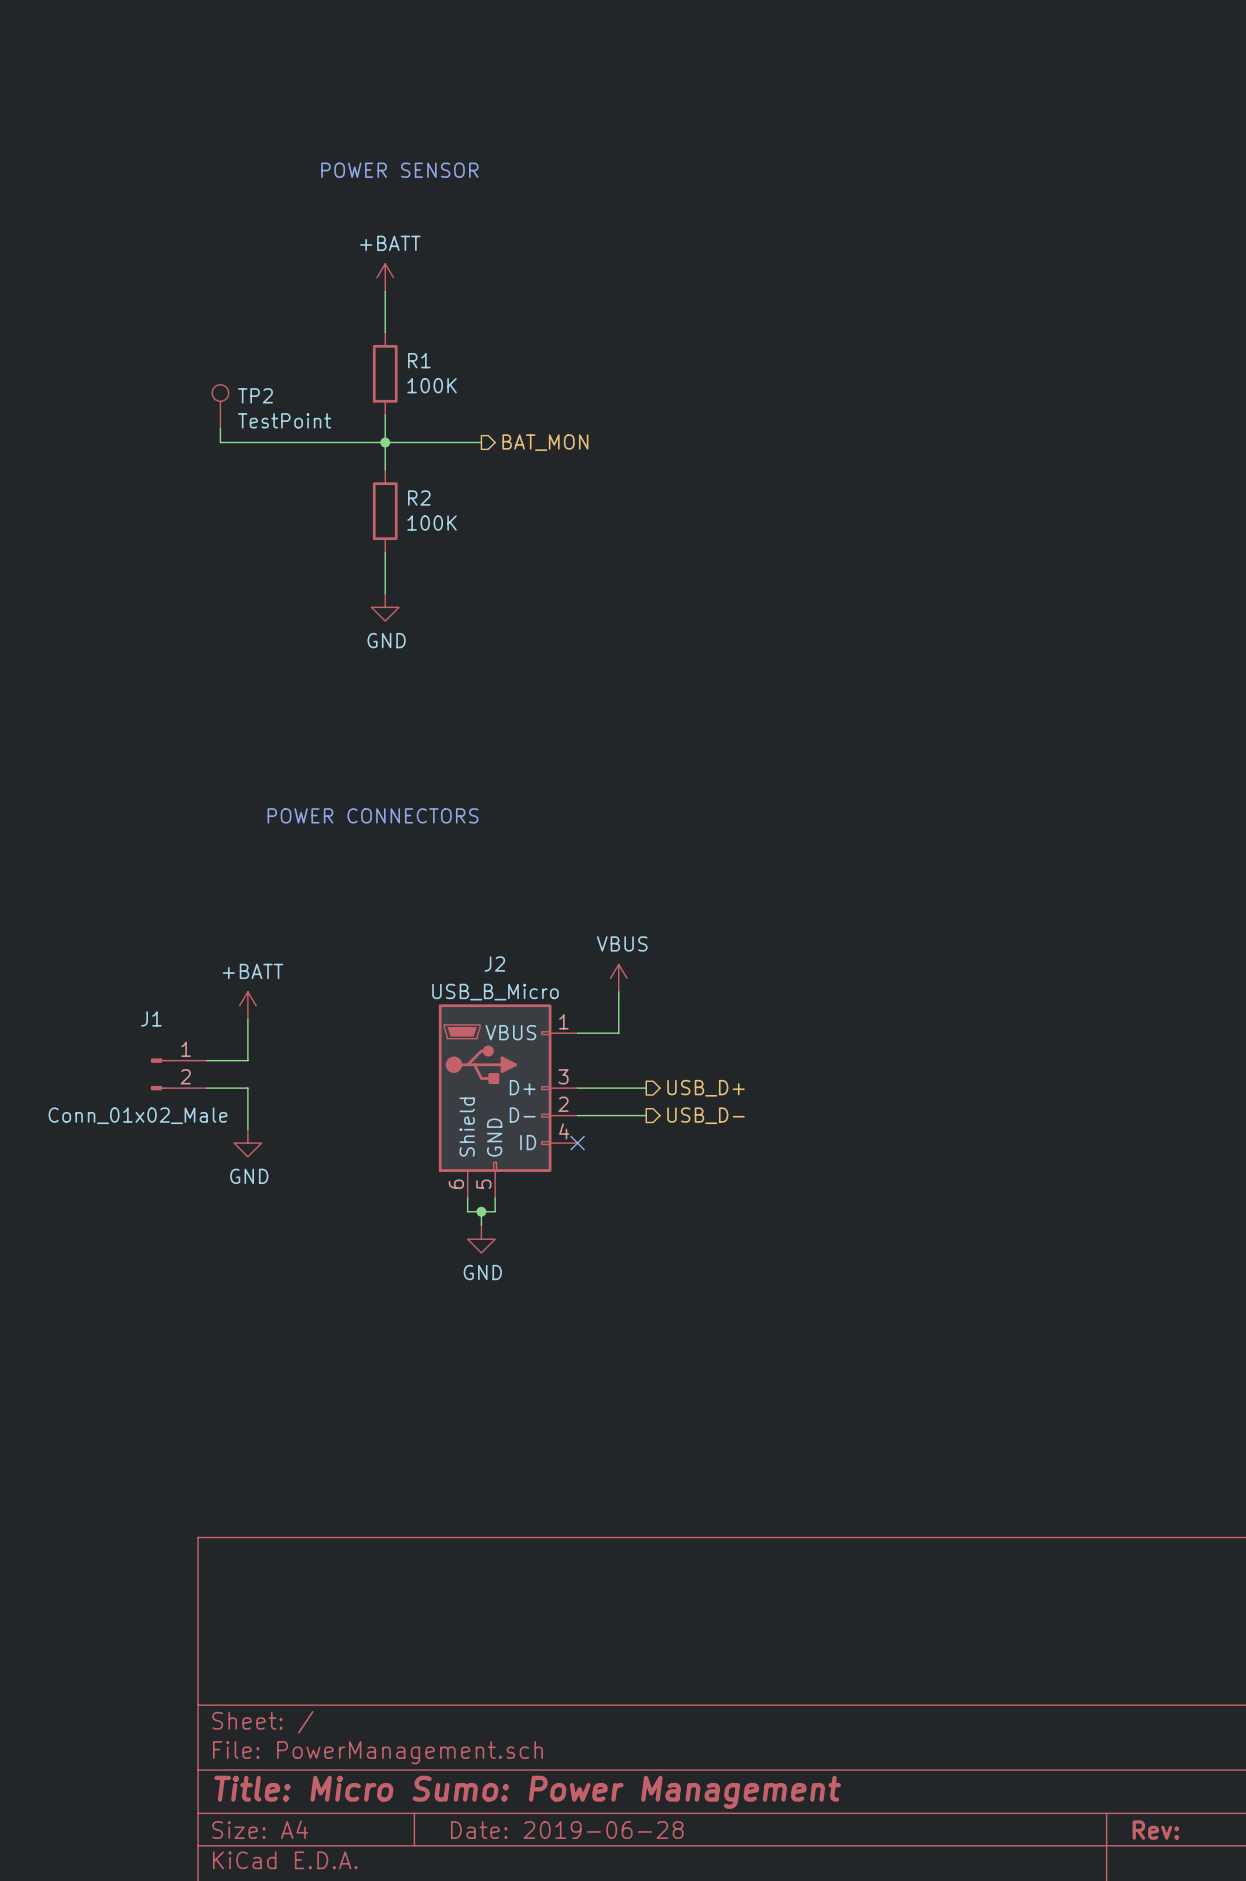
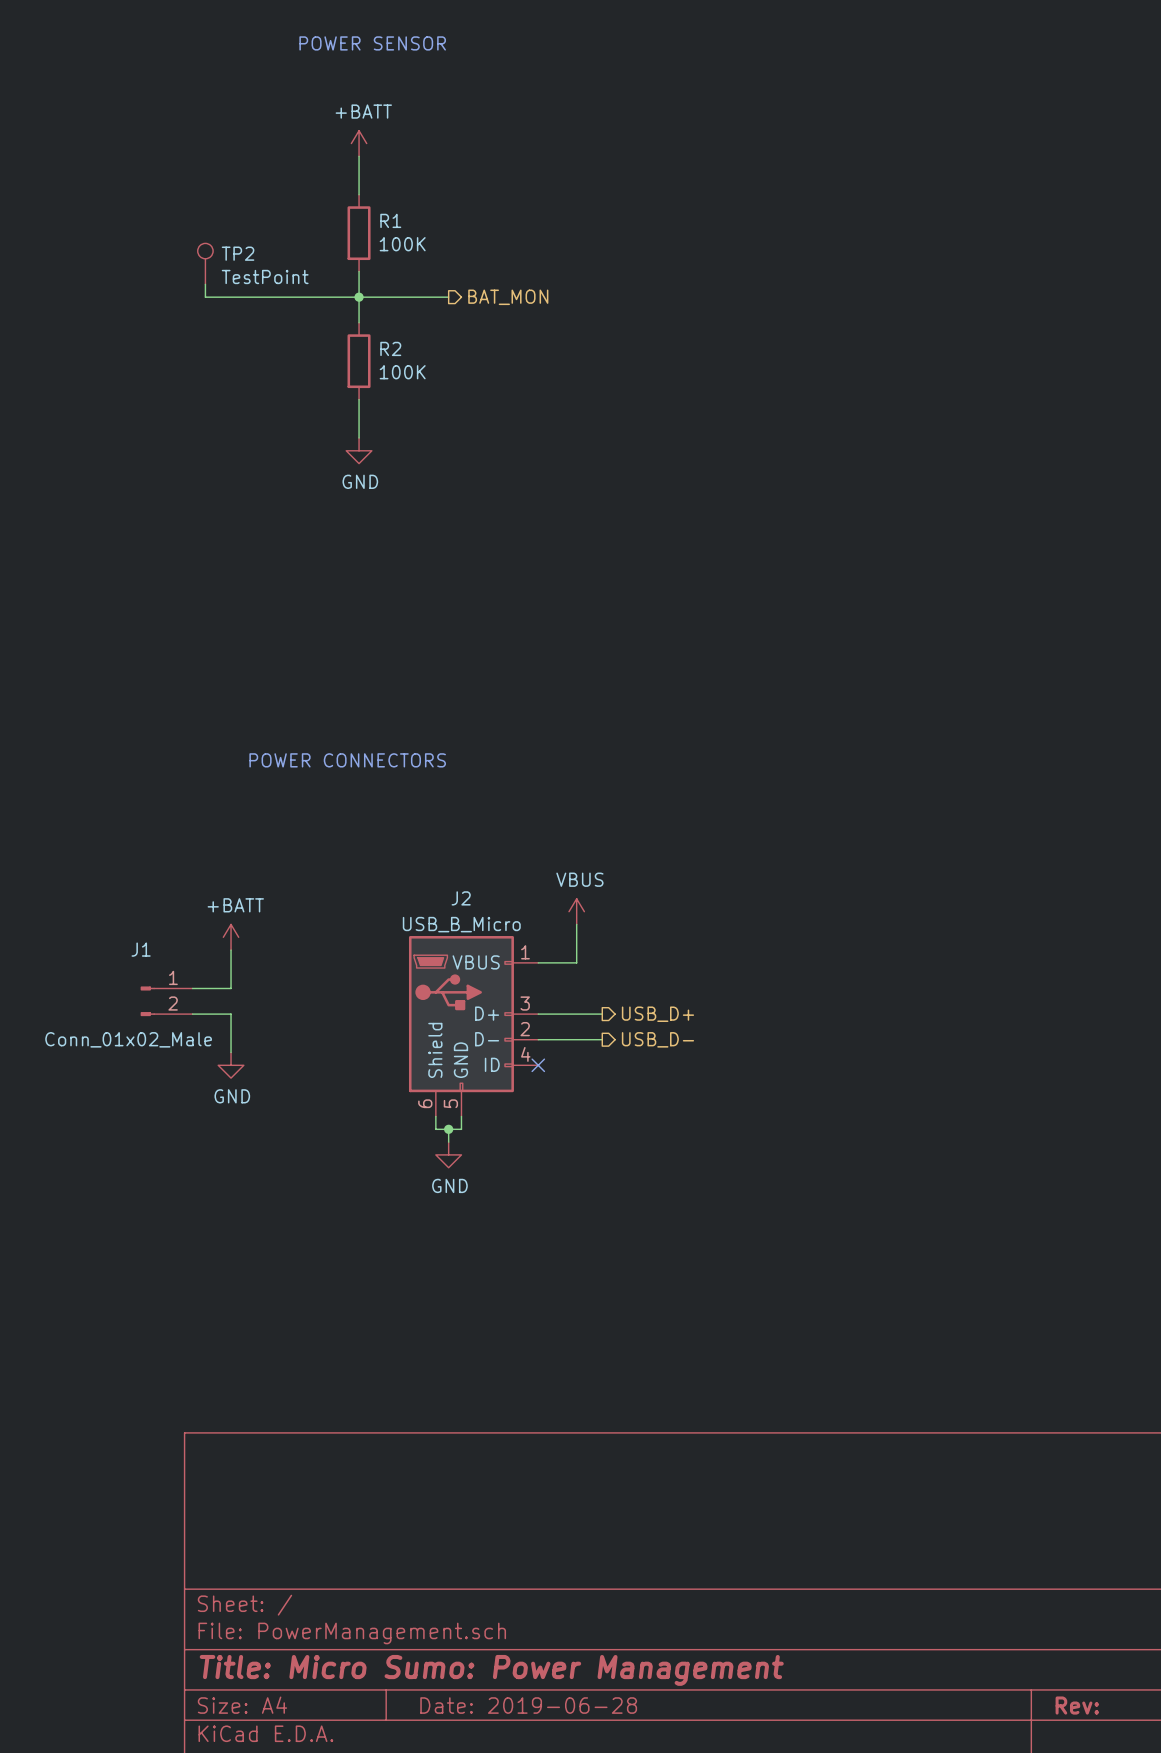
wire: none -> (359, 156) (359, 194)
text position: POWER SENSOR (399, 170) -> POWER SENSOR (372, 43)
power symbol position: +BATT (385, 277) -> +BATT (359, 143)
junction: none -> (359, 297)
R1 position: (385, 373) -> (359, 233)
TP2 position: (220, 406) -> (205, 263)
wire: (220, 428) (220, 442) (481, 442) -> (205, 284) (205, 297) (448, 297)
junction: (385, 442) -> none
hierarchical label position: BAT_MON (545, 442) -> BAT_MON (508, 297)
R2 position: (385, 511) -> (359, 361)
wire: (385, 552) (385, 593) -> none
power symbol position: GND (385, 607) -> GND (359, 450)

